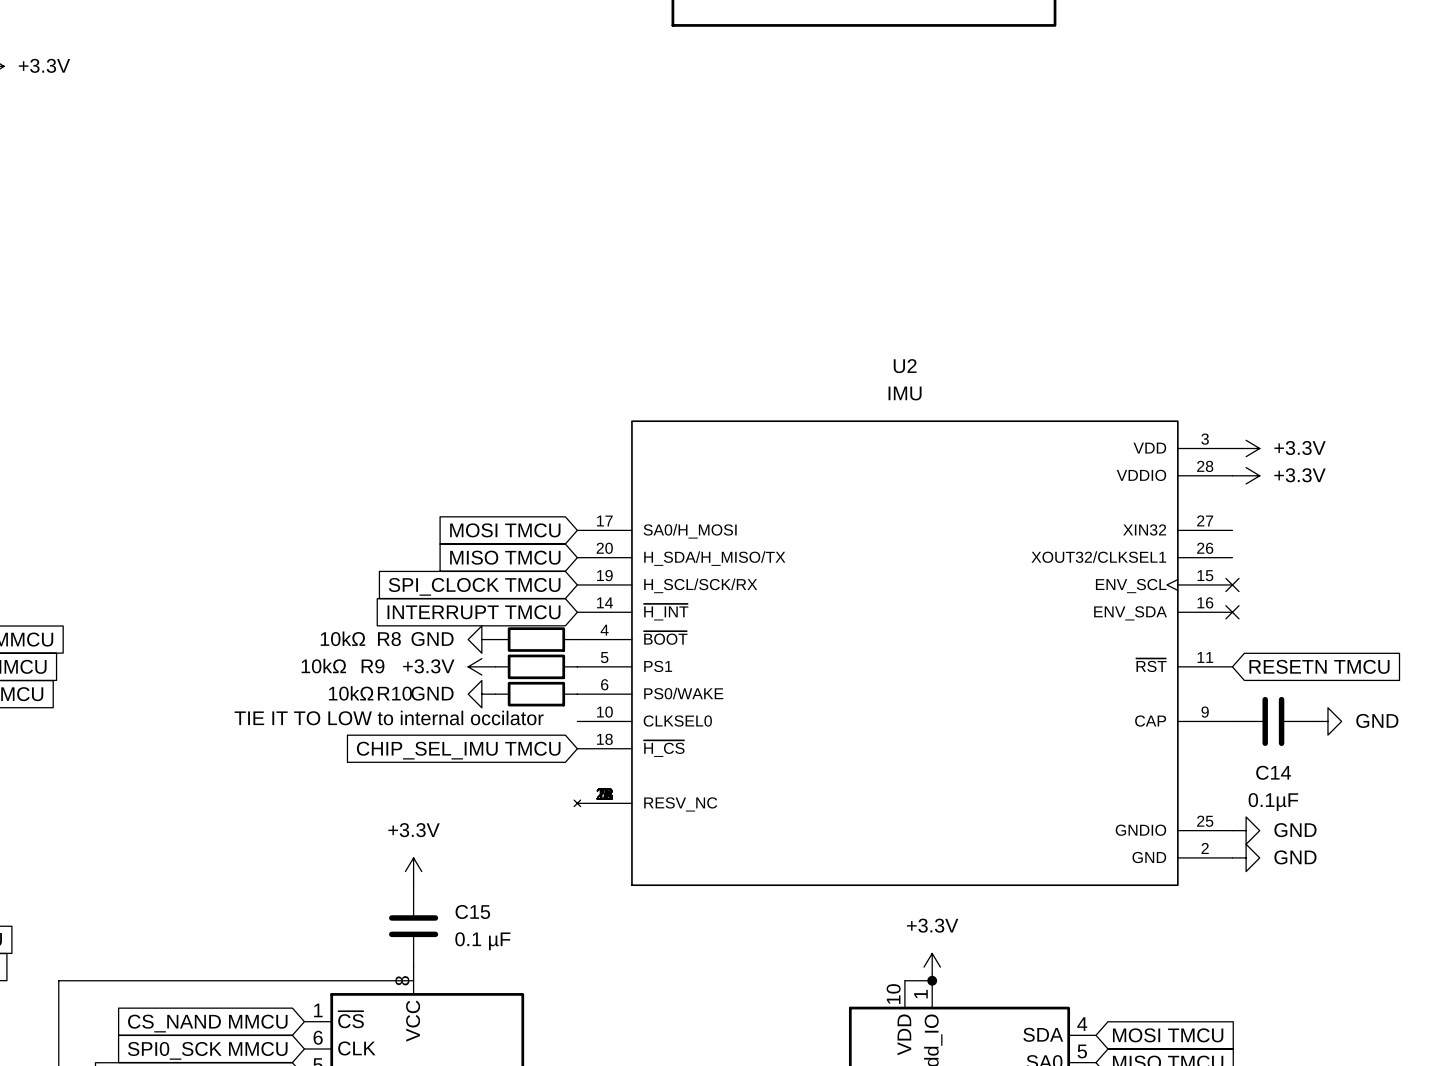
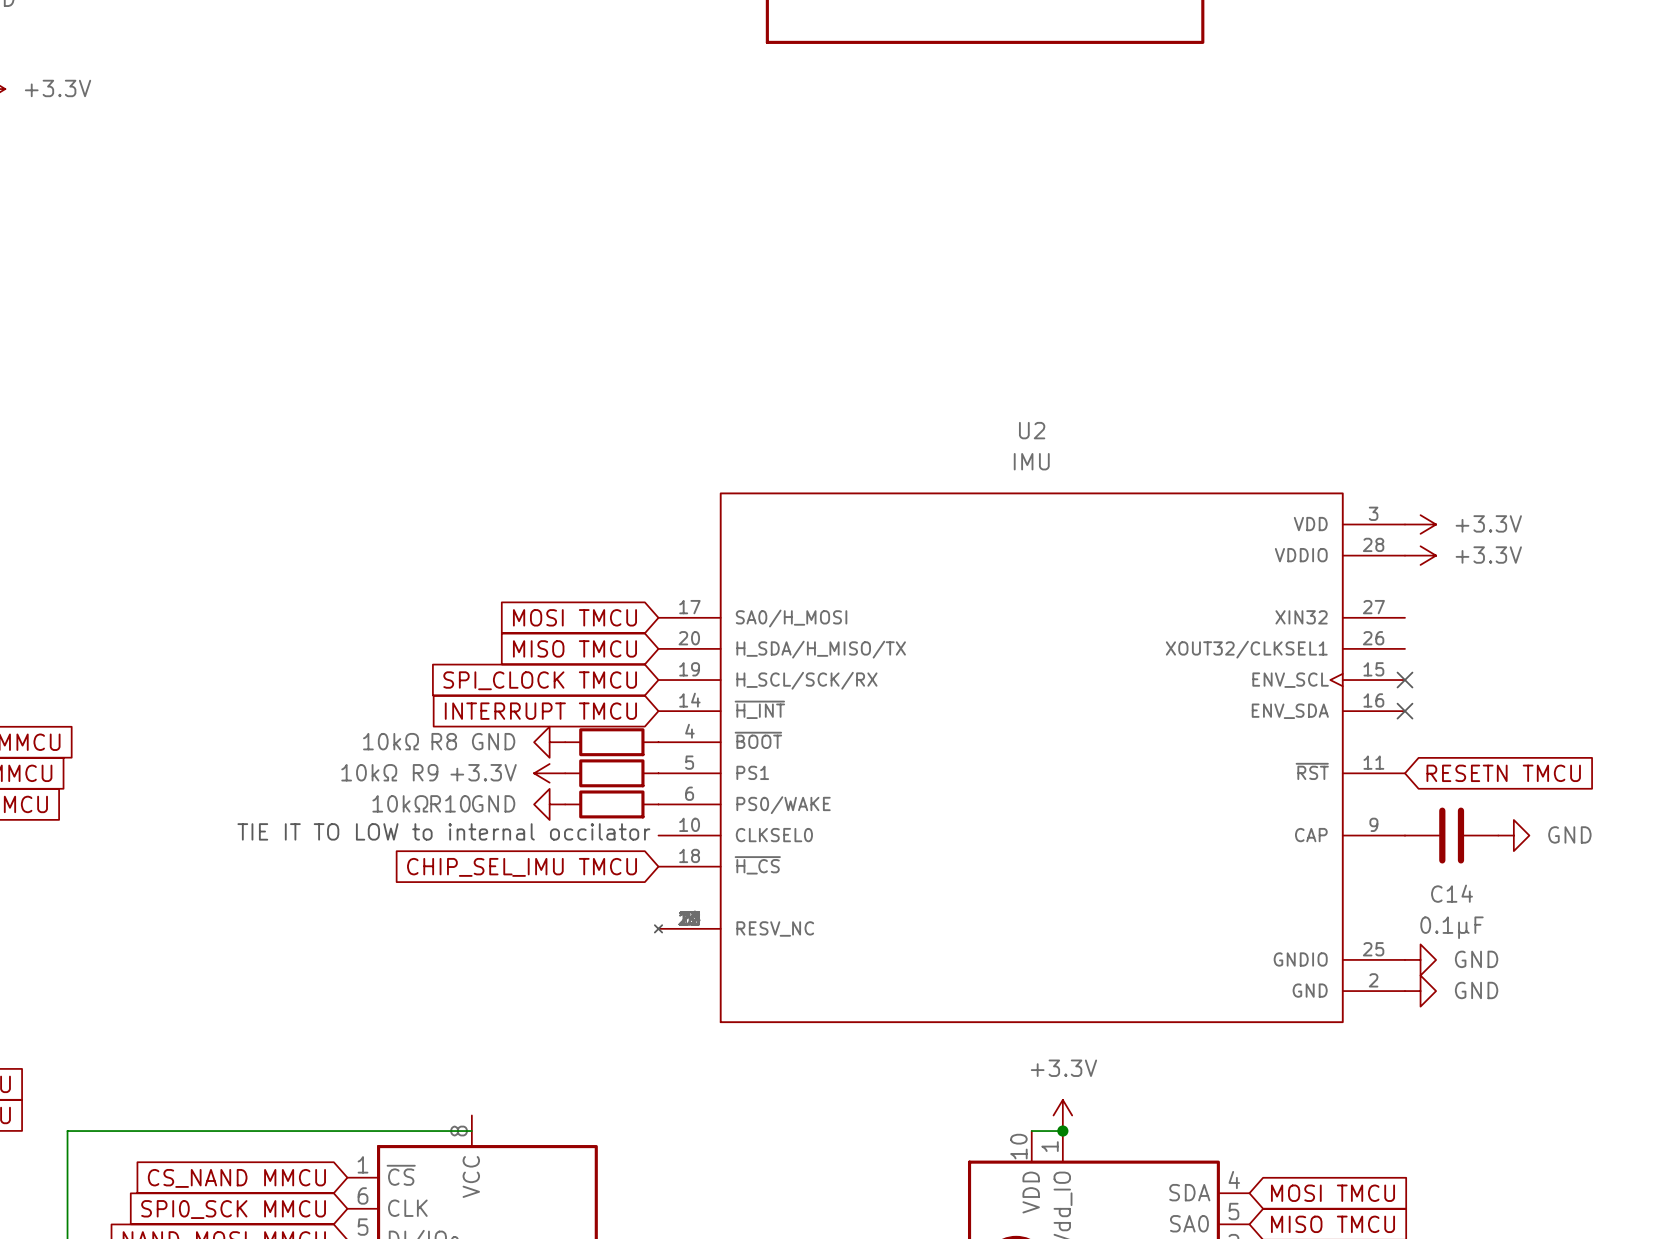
power symbol: +3.3V (413, 871) -> none
C15: 0.1 µF (413, 926) -> none

